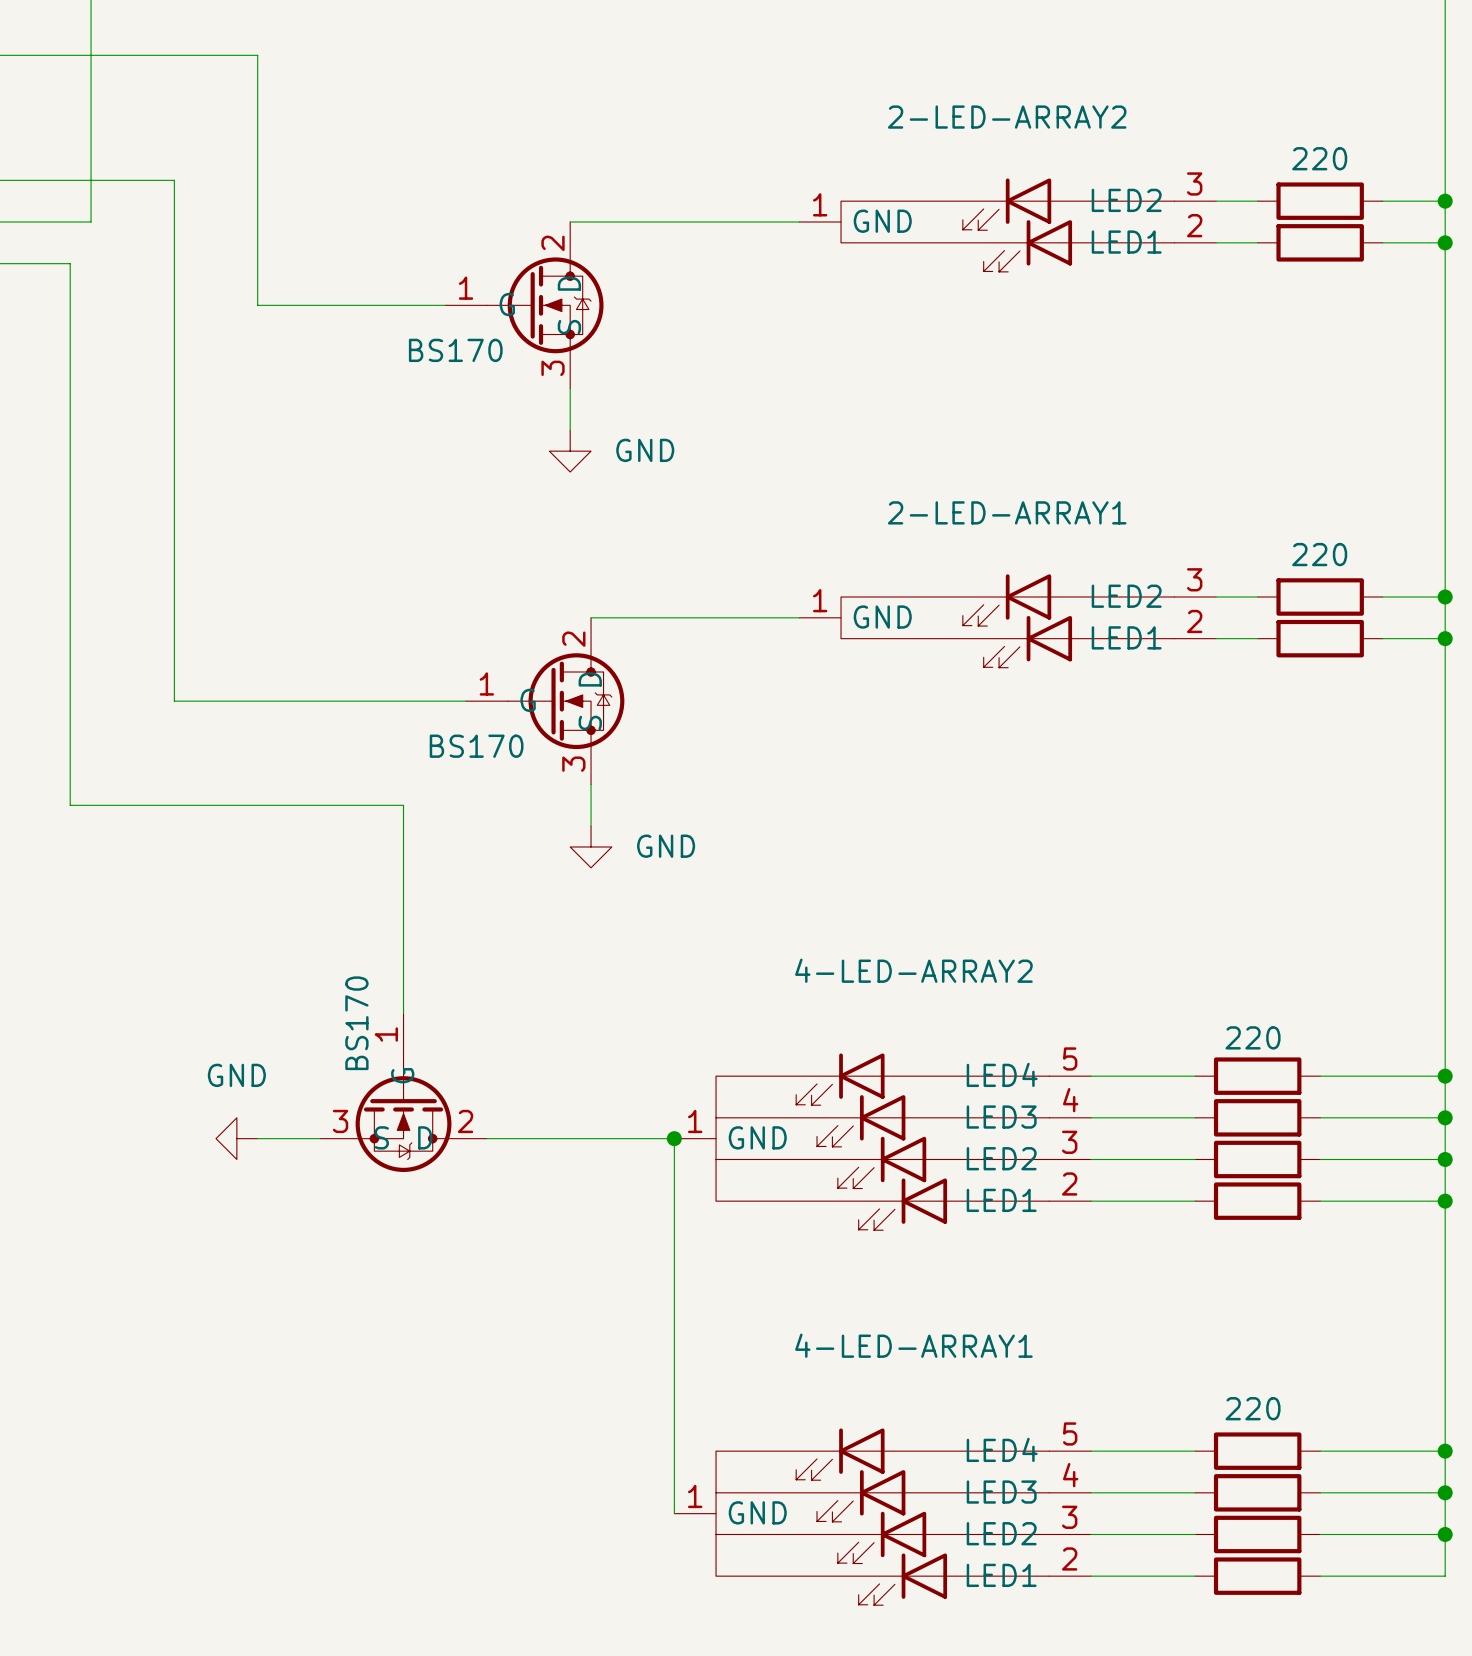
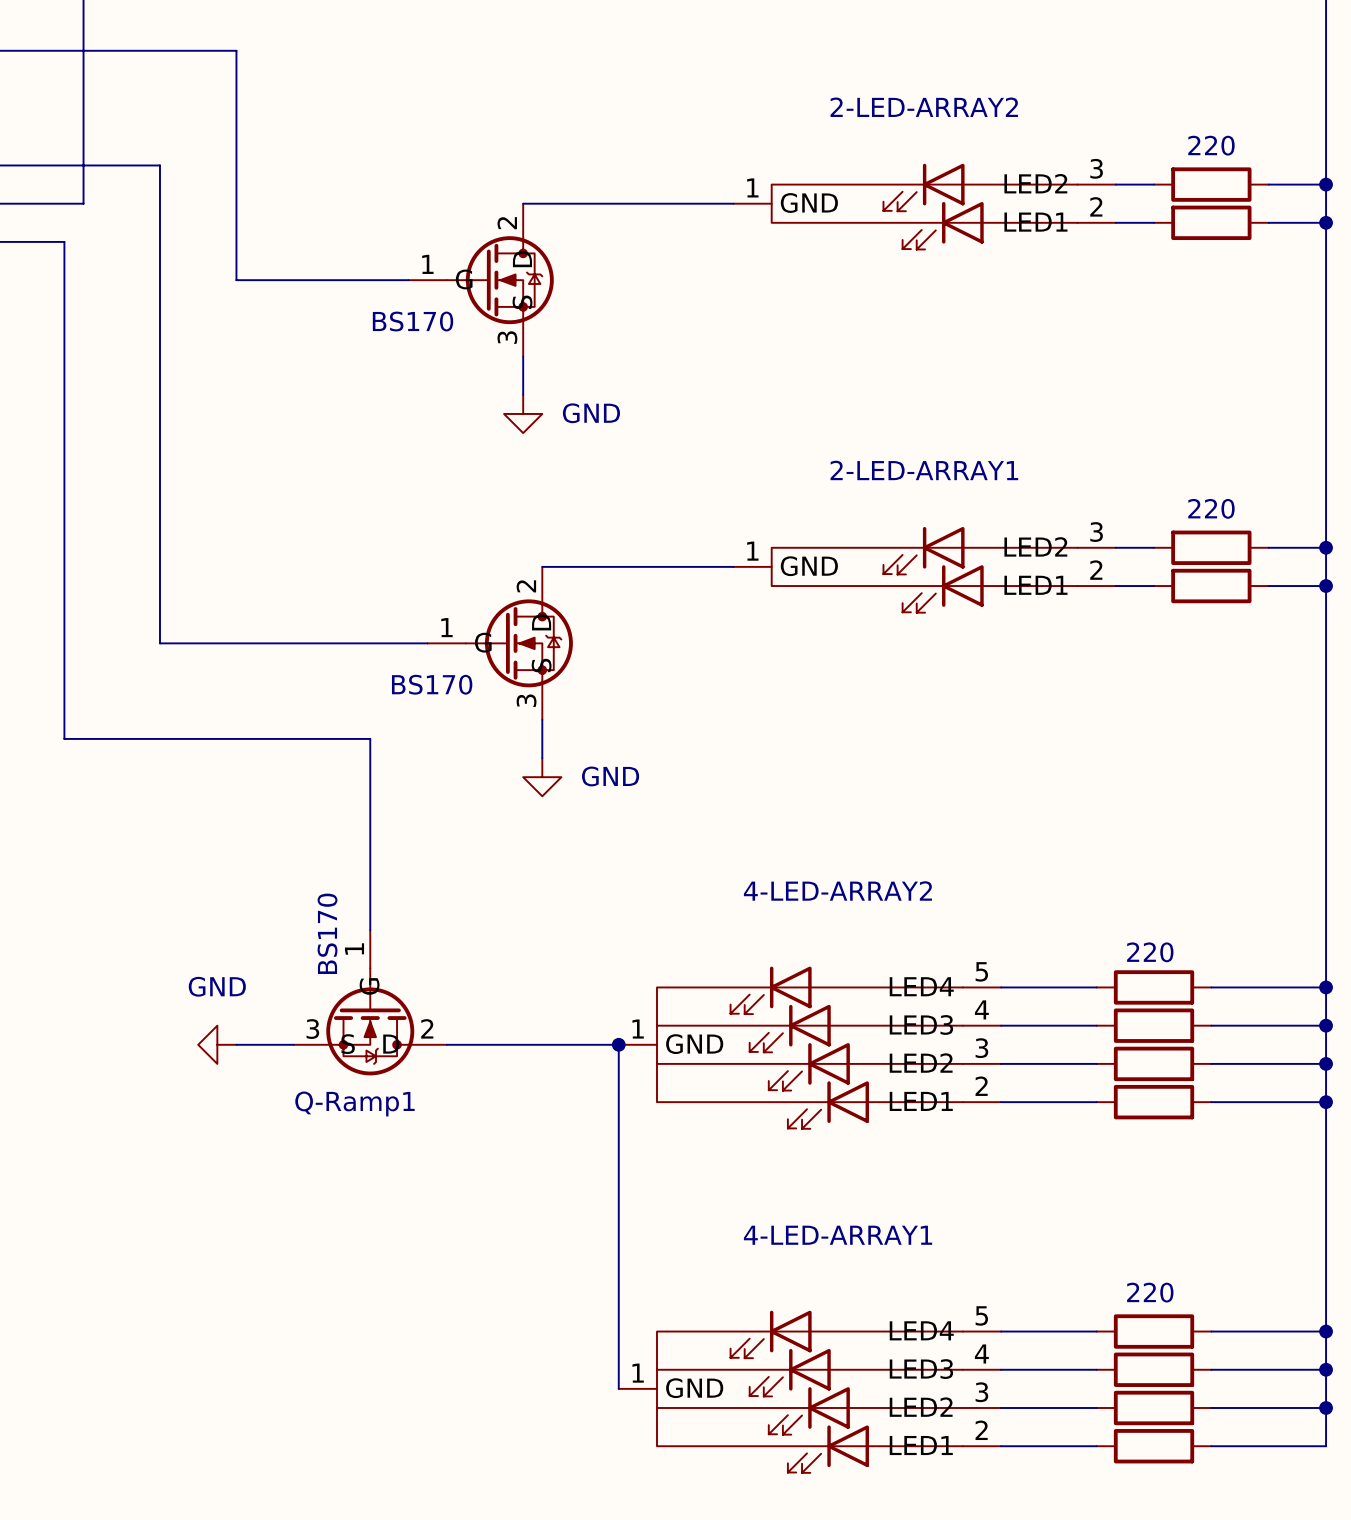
Q-Ramp1 name: none -> Q-Ramp1 (354, 1103)

